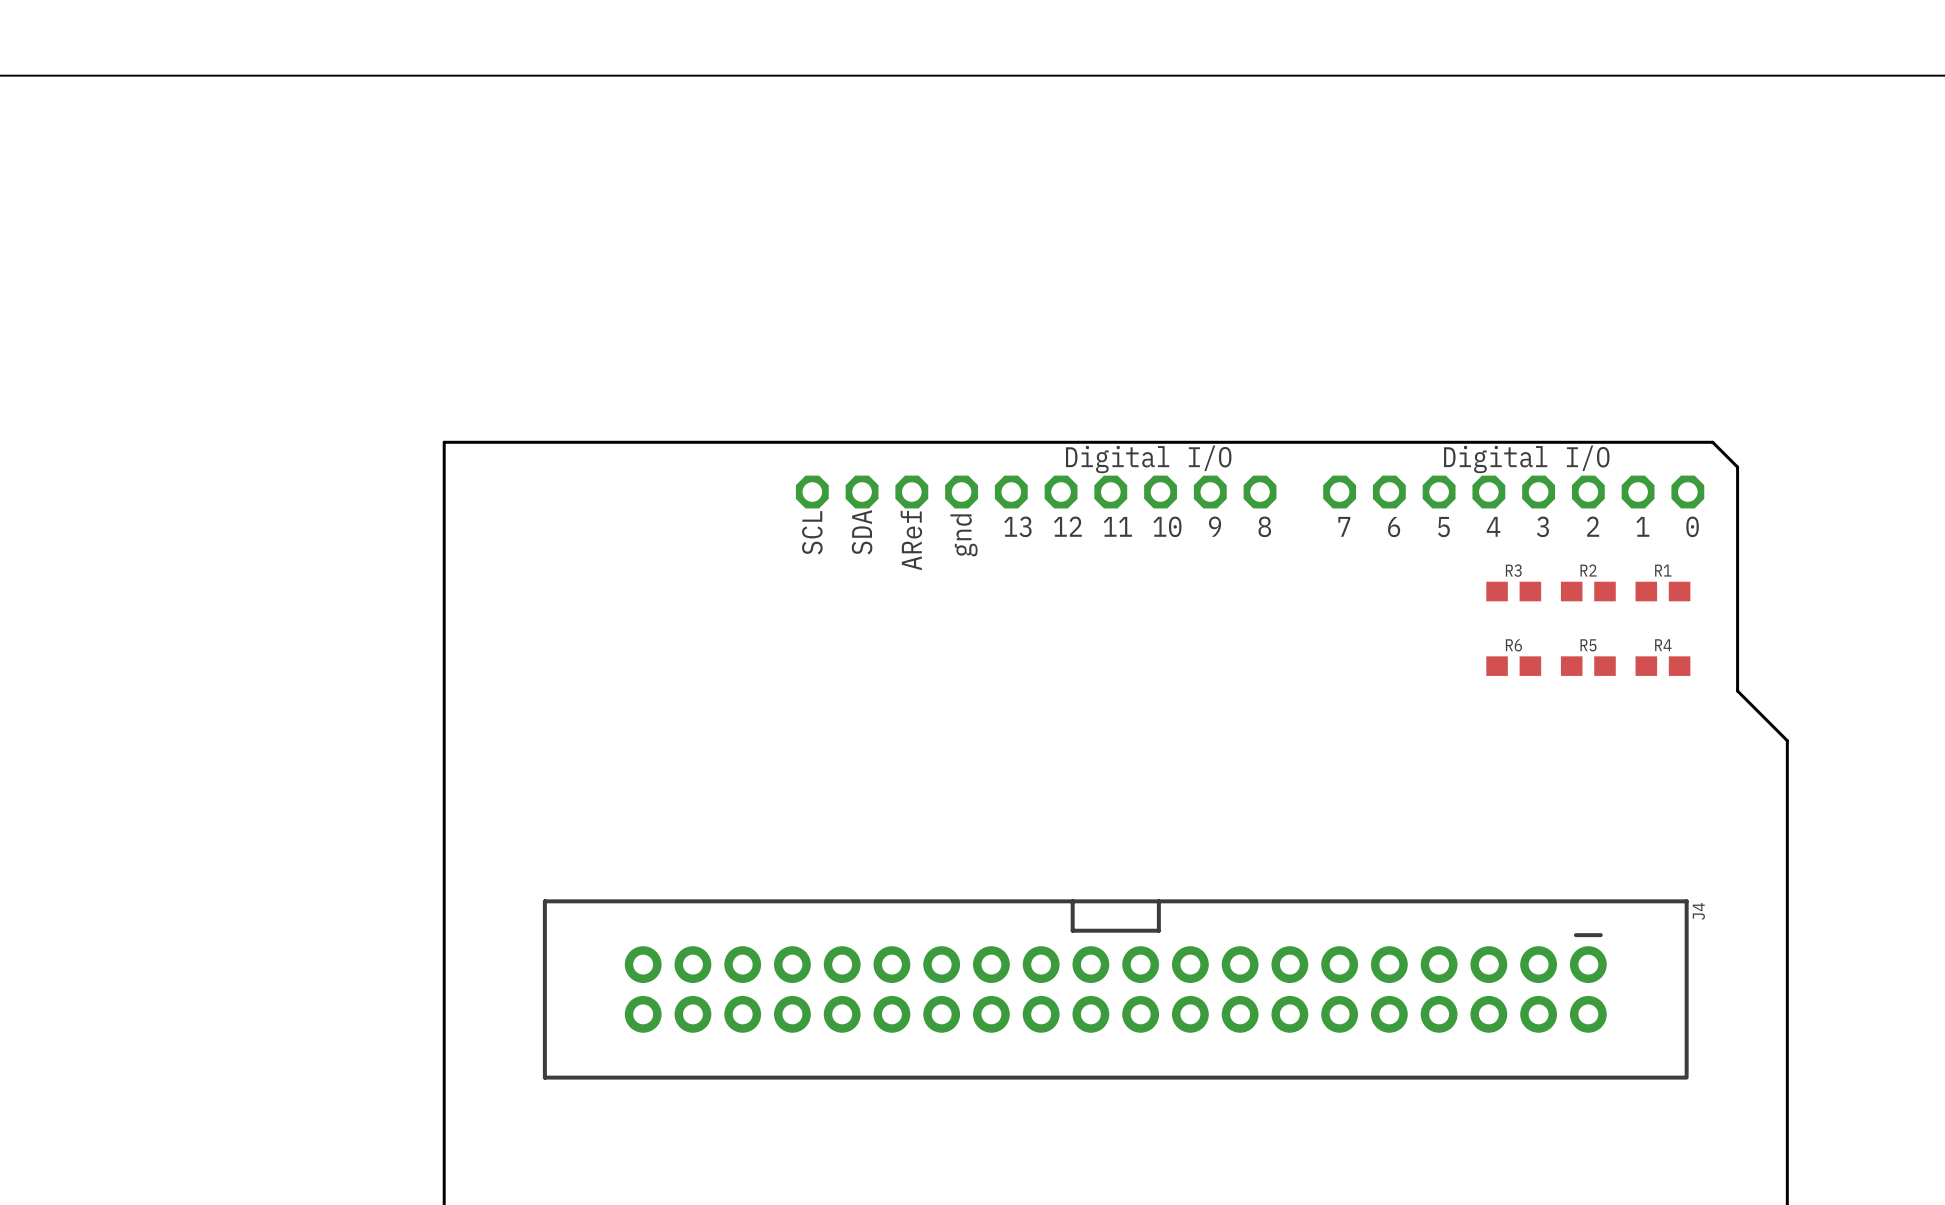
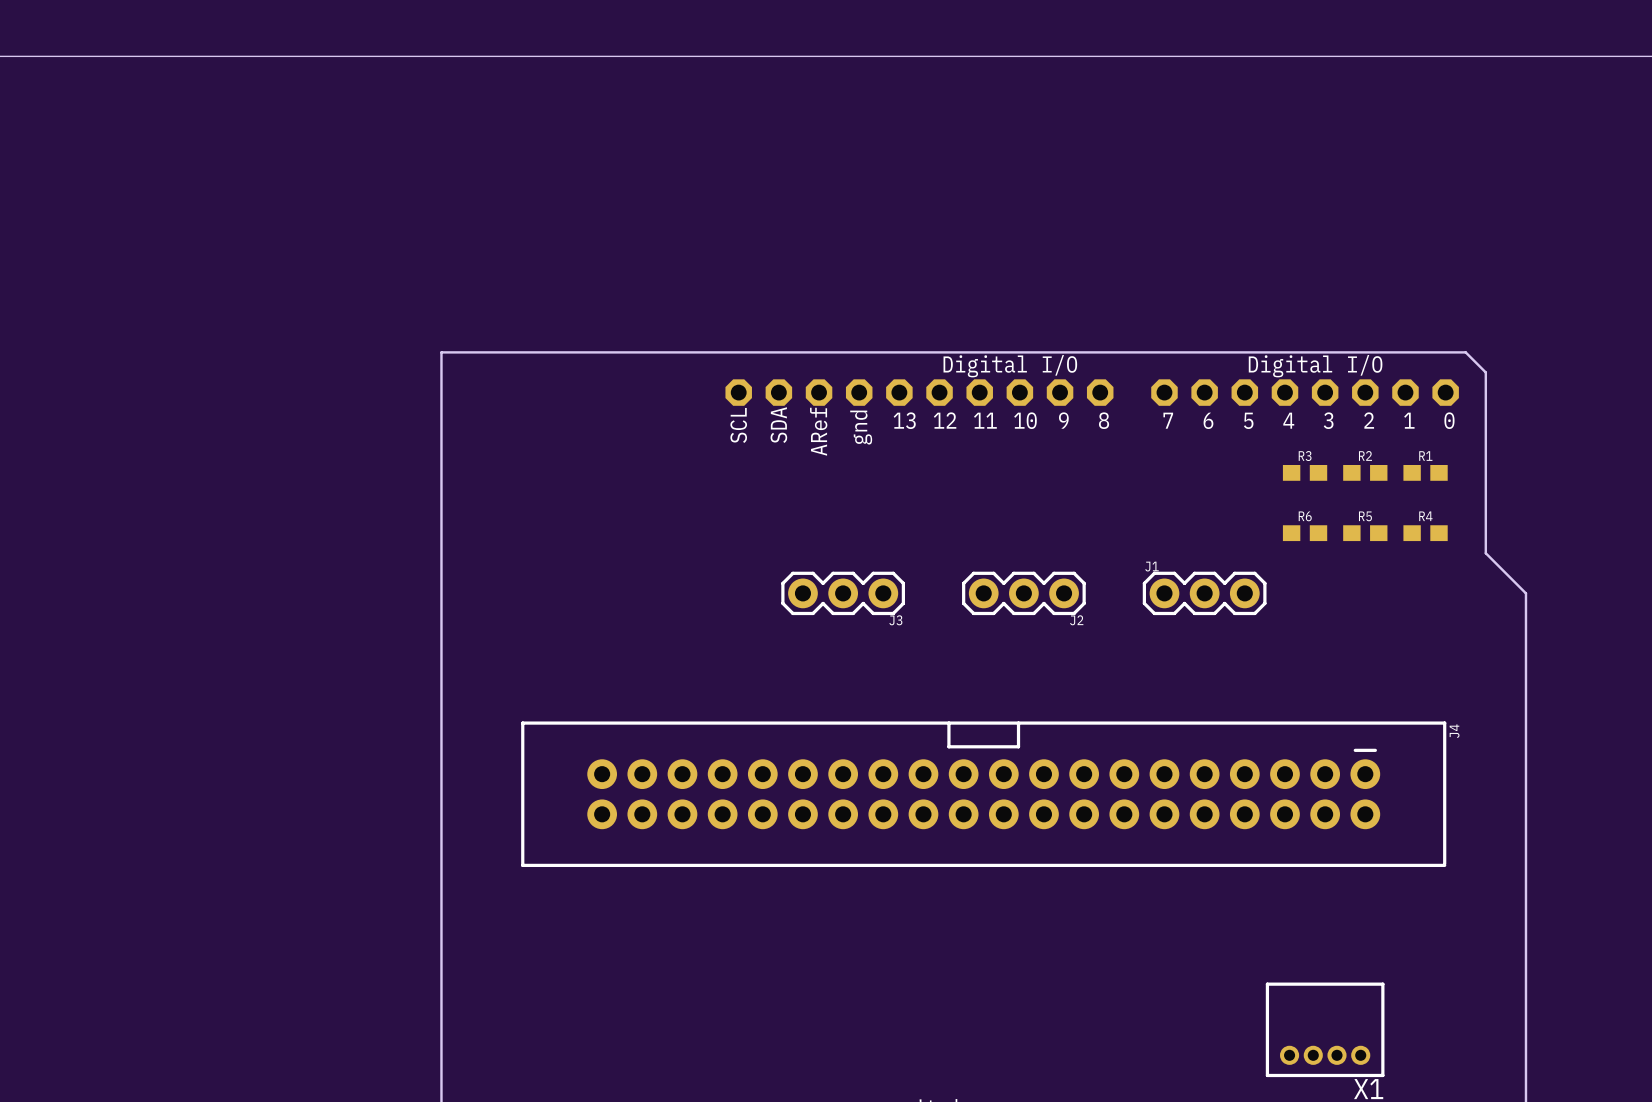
J3: none -> (843, 593)
J2: none -> (1023, 593)
J1: none -> (1204, 593)

